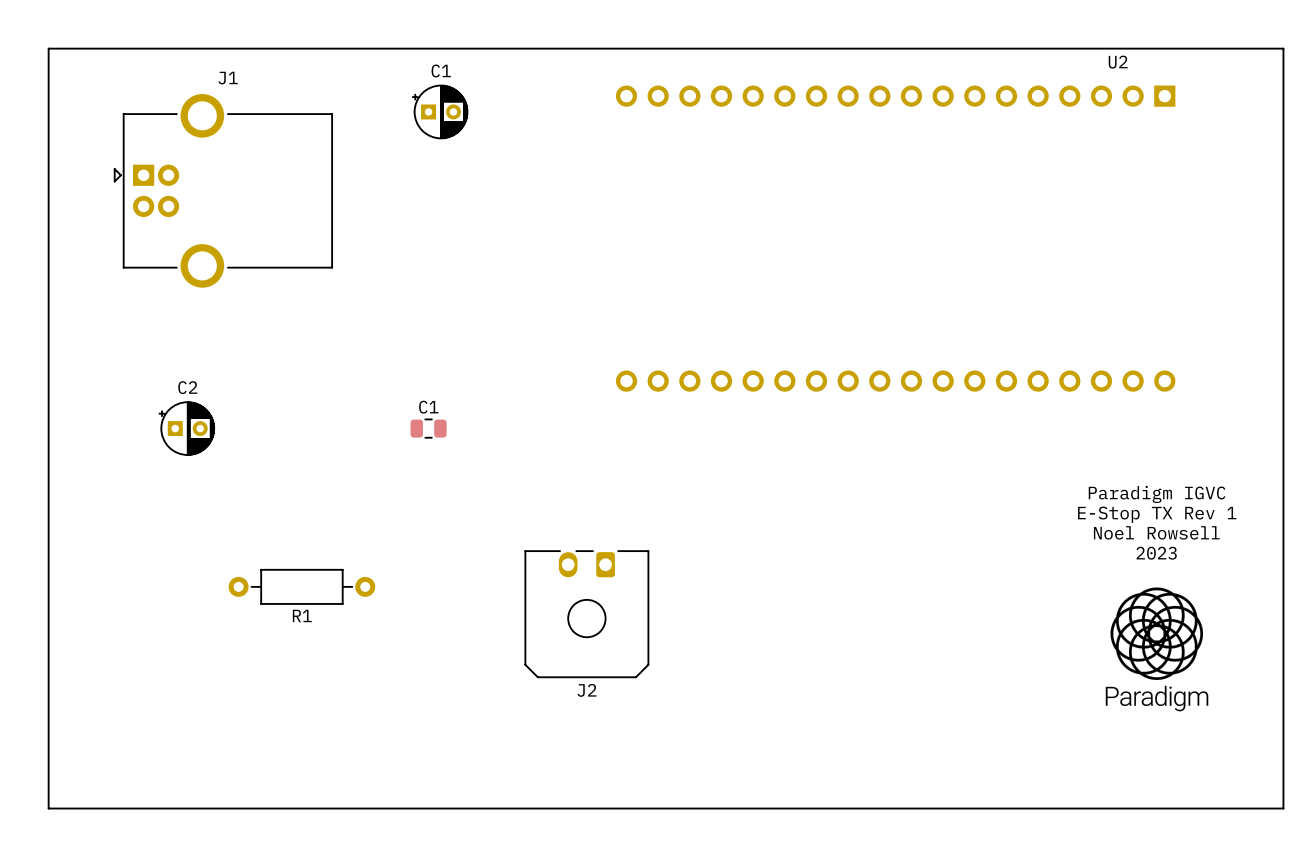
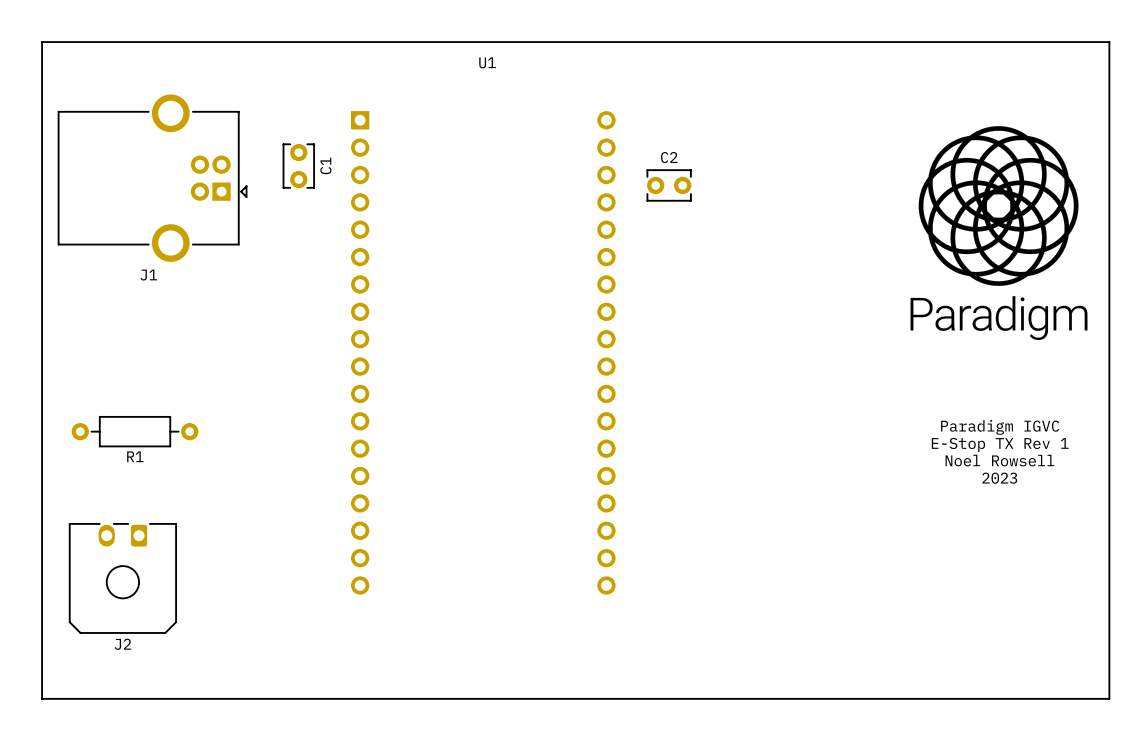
C1: (440, 111) -> none
drawing: none -> [910, 126, 1088, 341]
J1 rotation: 0° (223, 190) -> 180° (152, 178)
C1: none -> (298, 166)
U2: (895, 238) -> none
C2 footprint: [158, 401, 215, 456] -> [646, 169, 692, 202]
U1: none -> (483, 352)
C1: (428, 428) -> none
R1 position: (301, 586) -> (135, 431)
drawing: [1105, 587, 1209, 712] -> none
J2 position: (586, 614) -> (122, 578)

